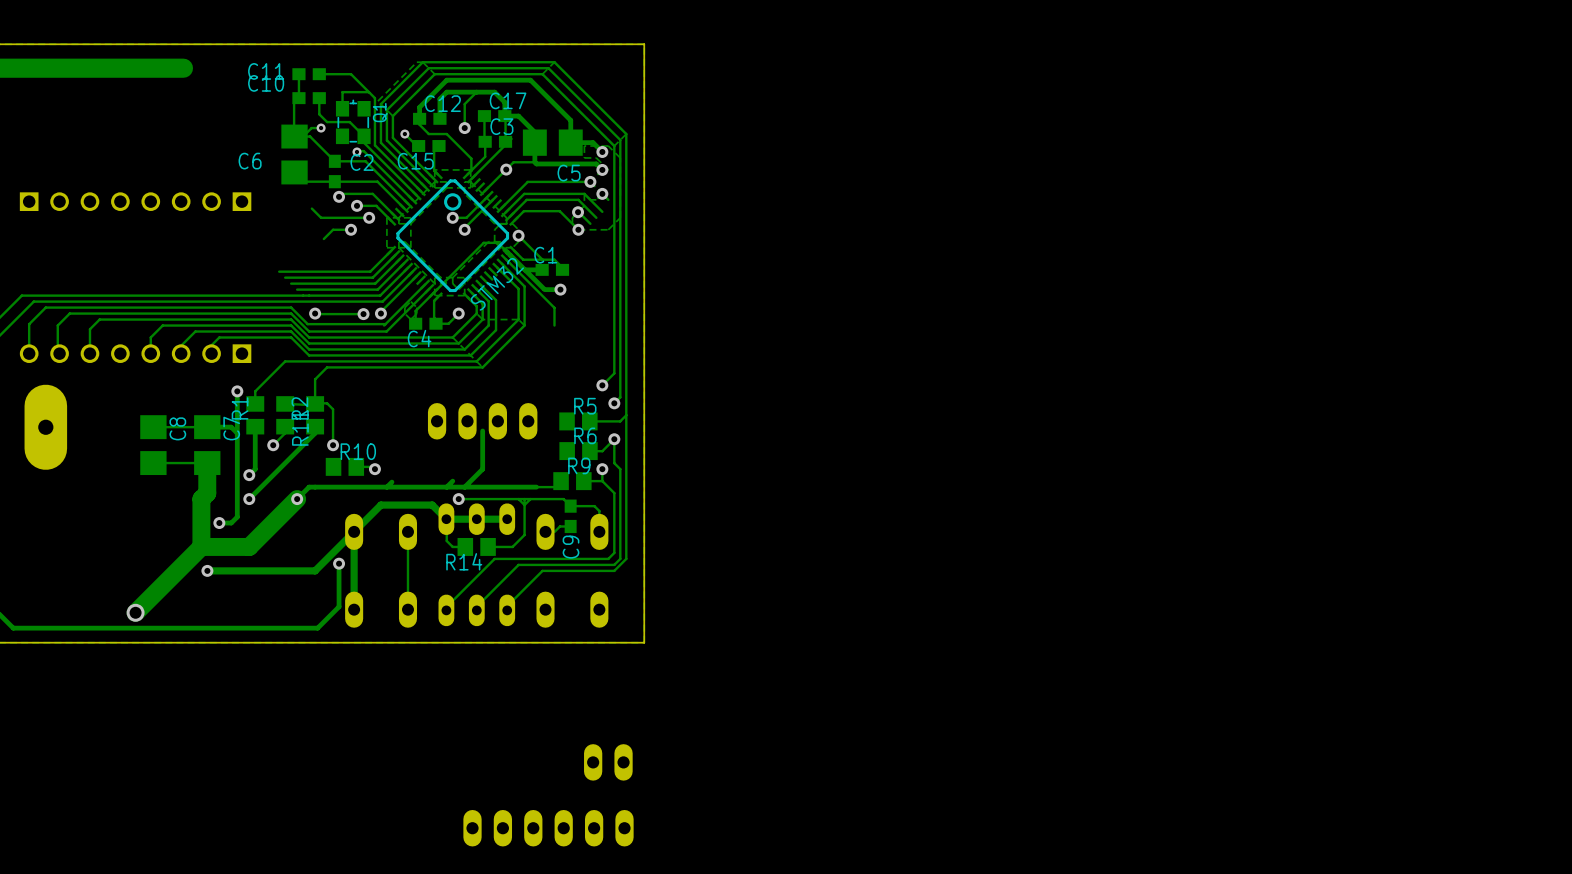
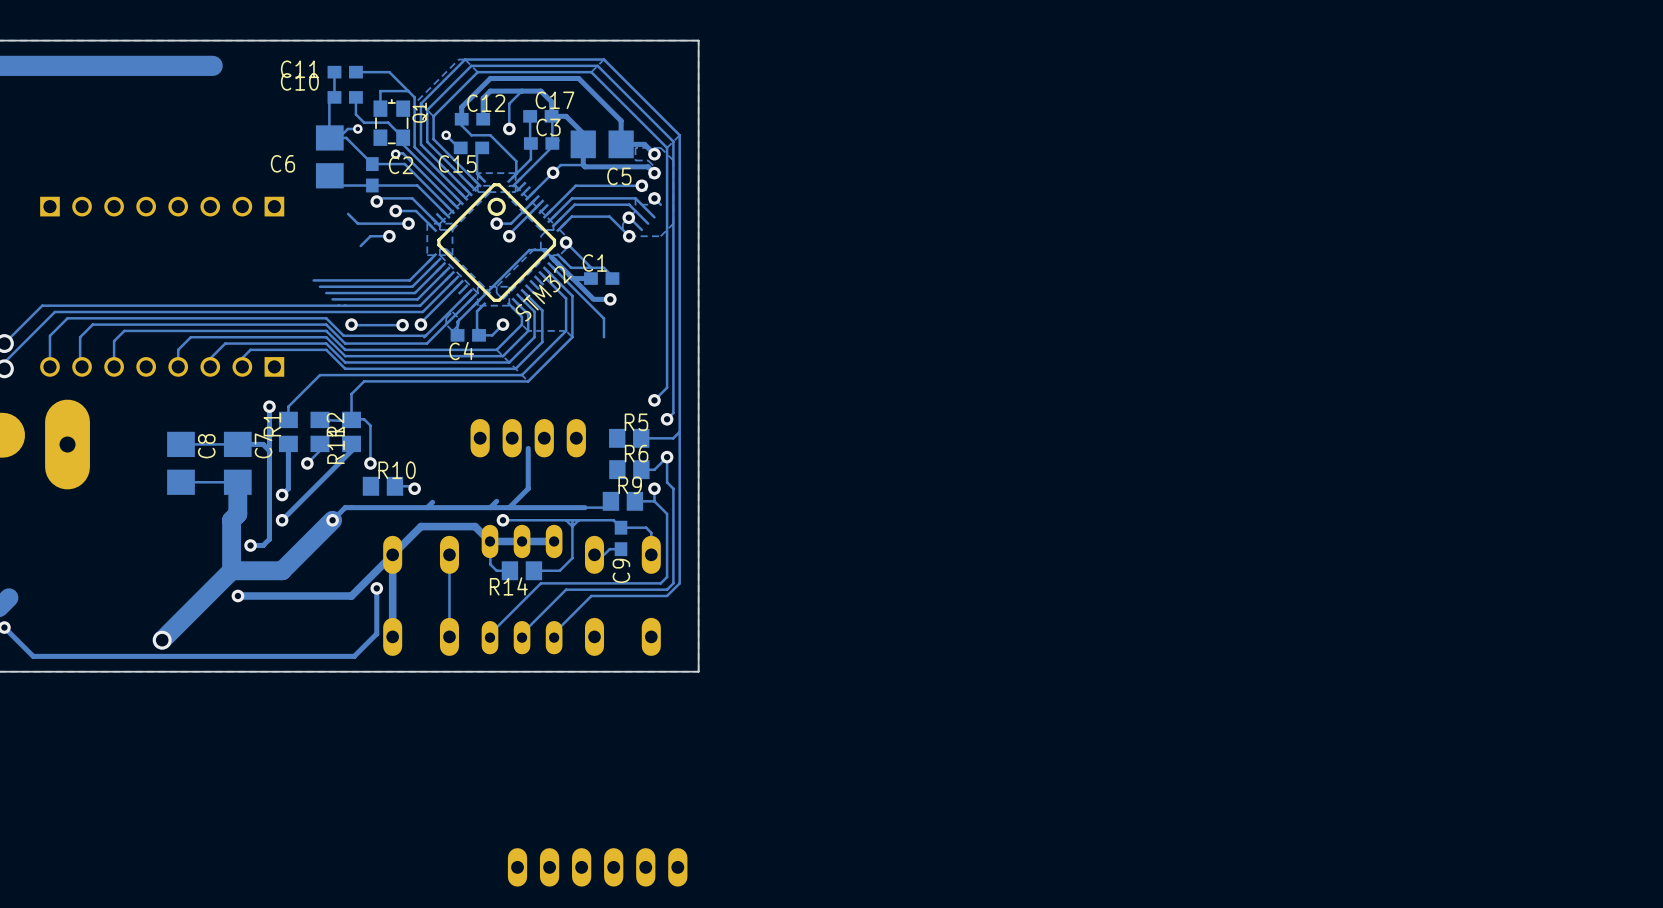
part: (608, 762) -> none

